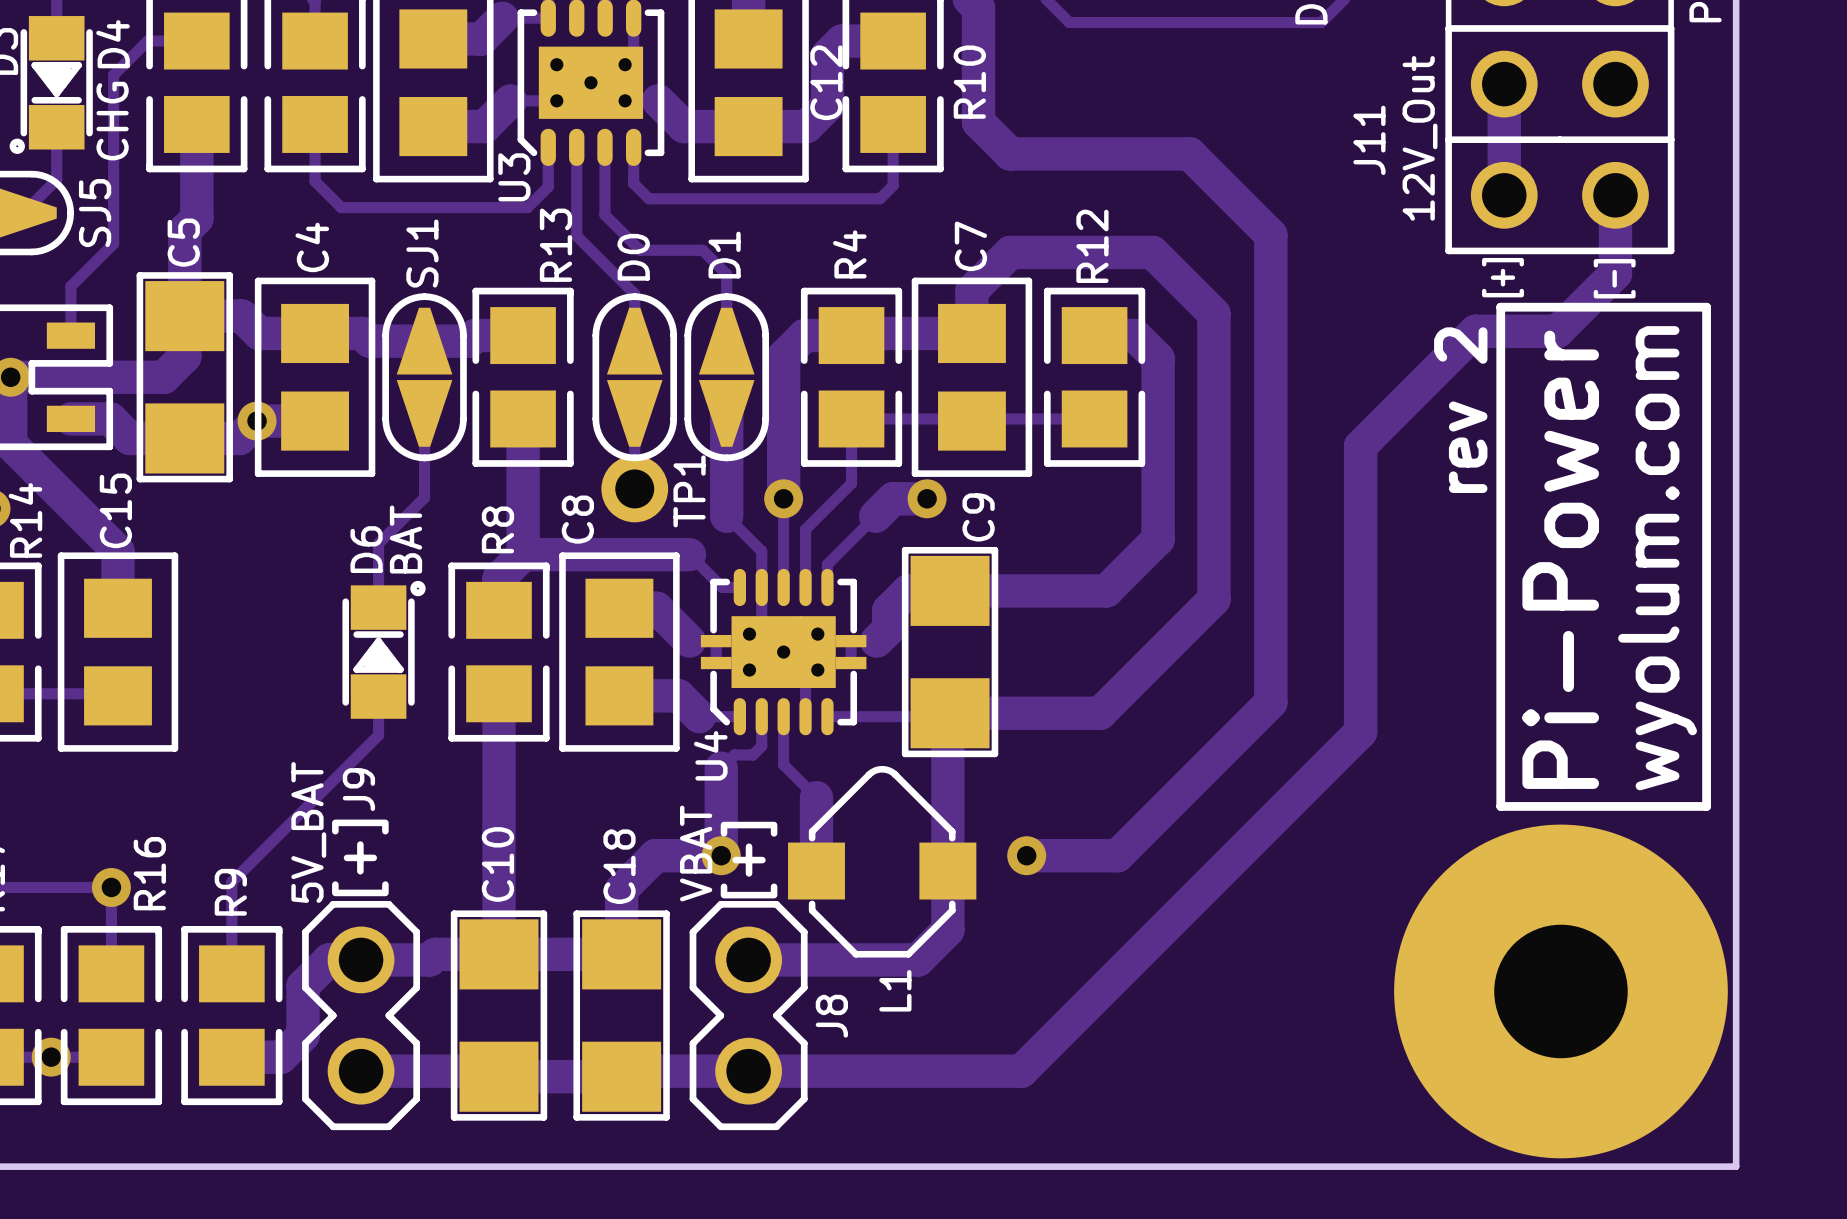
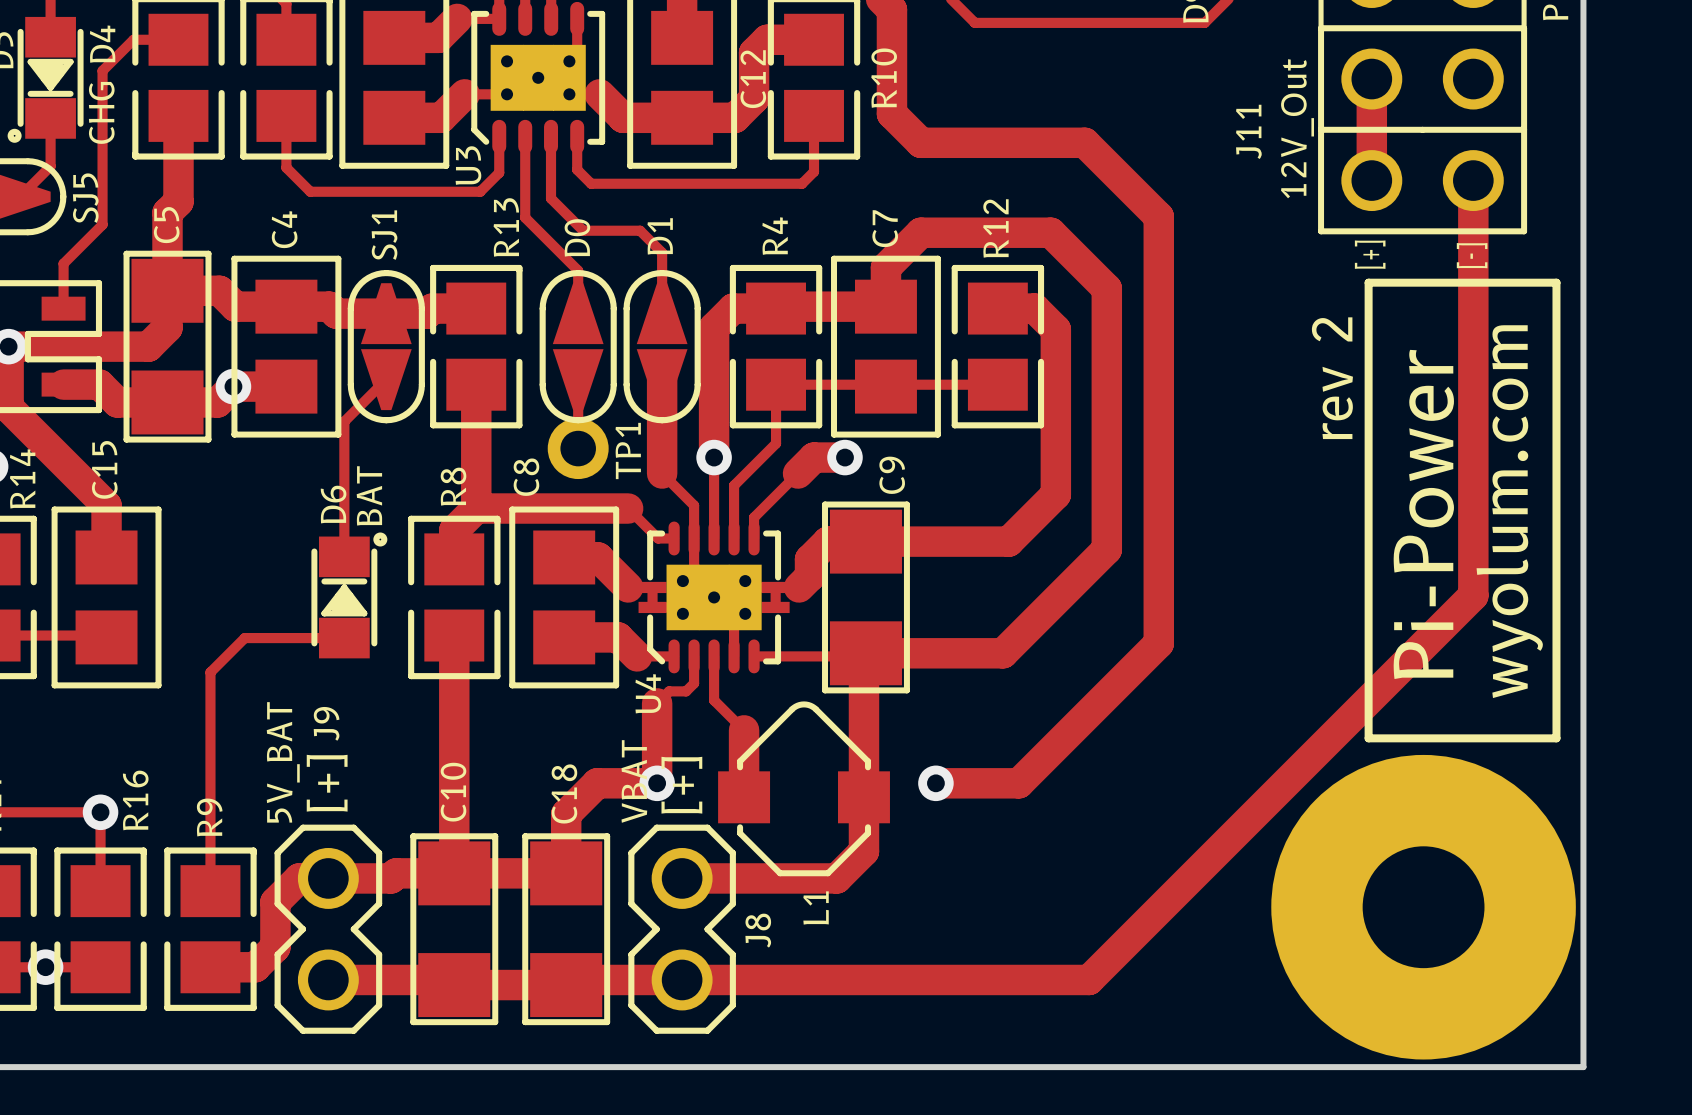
track: (1615, 273) (1557, 331) (1475, 331) (1360, 446) (1360, 731) (1021, 1071) -> (1473, 251) (1473, 595) (1089, 979) (931, 979)
track: (424, 413) (424, 497) (378, 543) -> (386, 379) (344, 421) (344, 498)
track: (378, 696) (378, 735) (231, 881) -> (344, 638) (244, 638) (210, 672) (210, 807)

